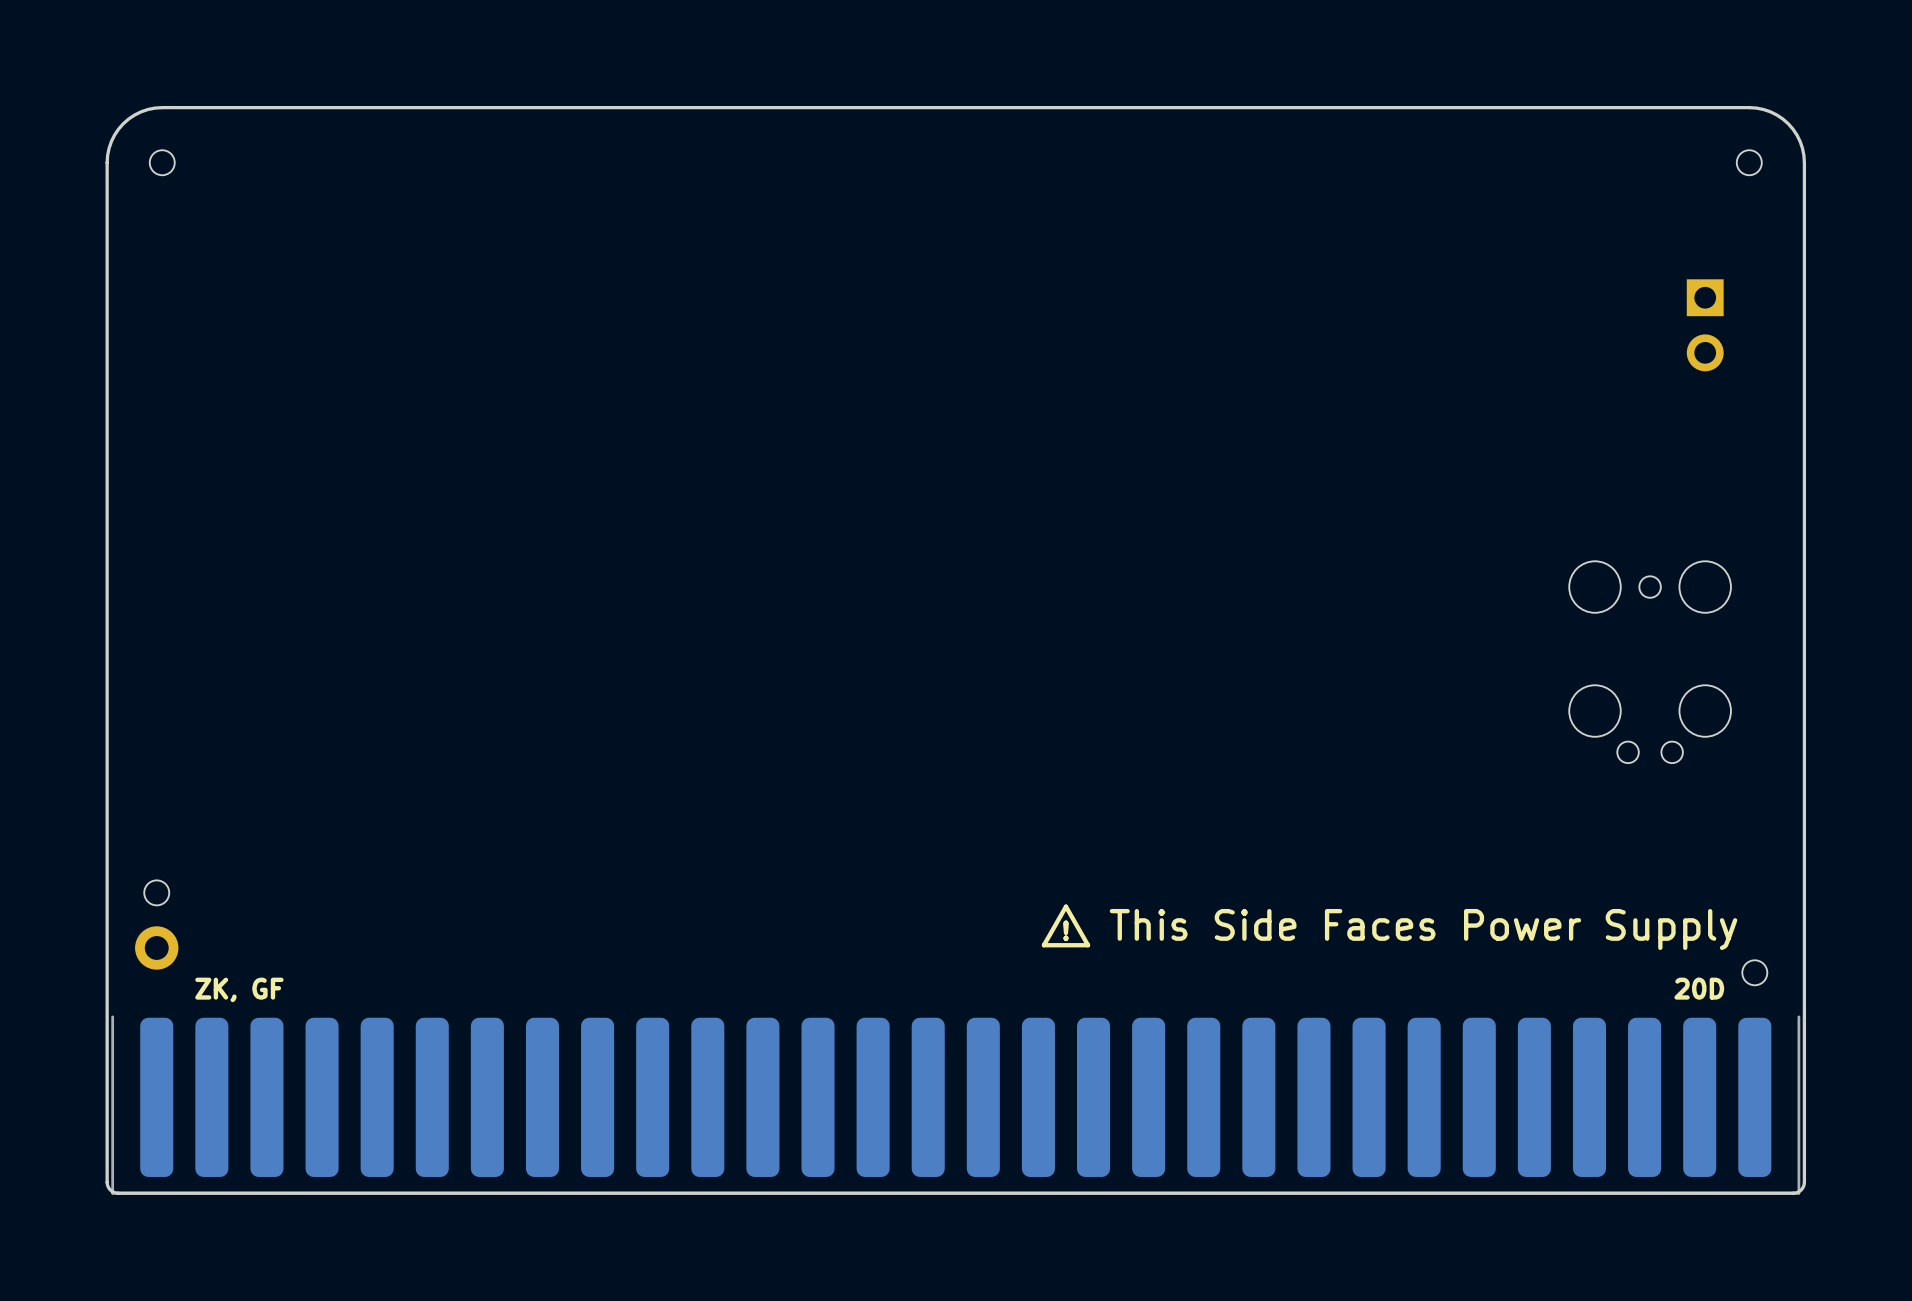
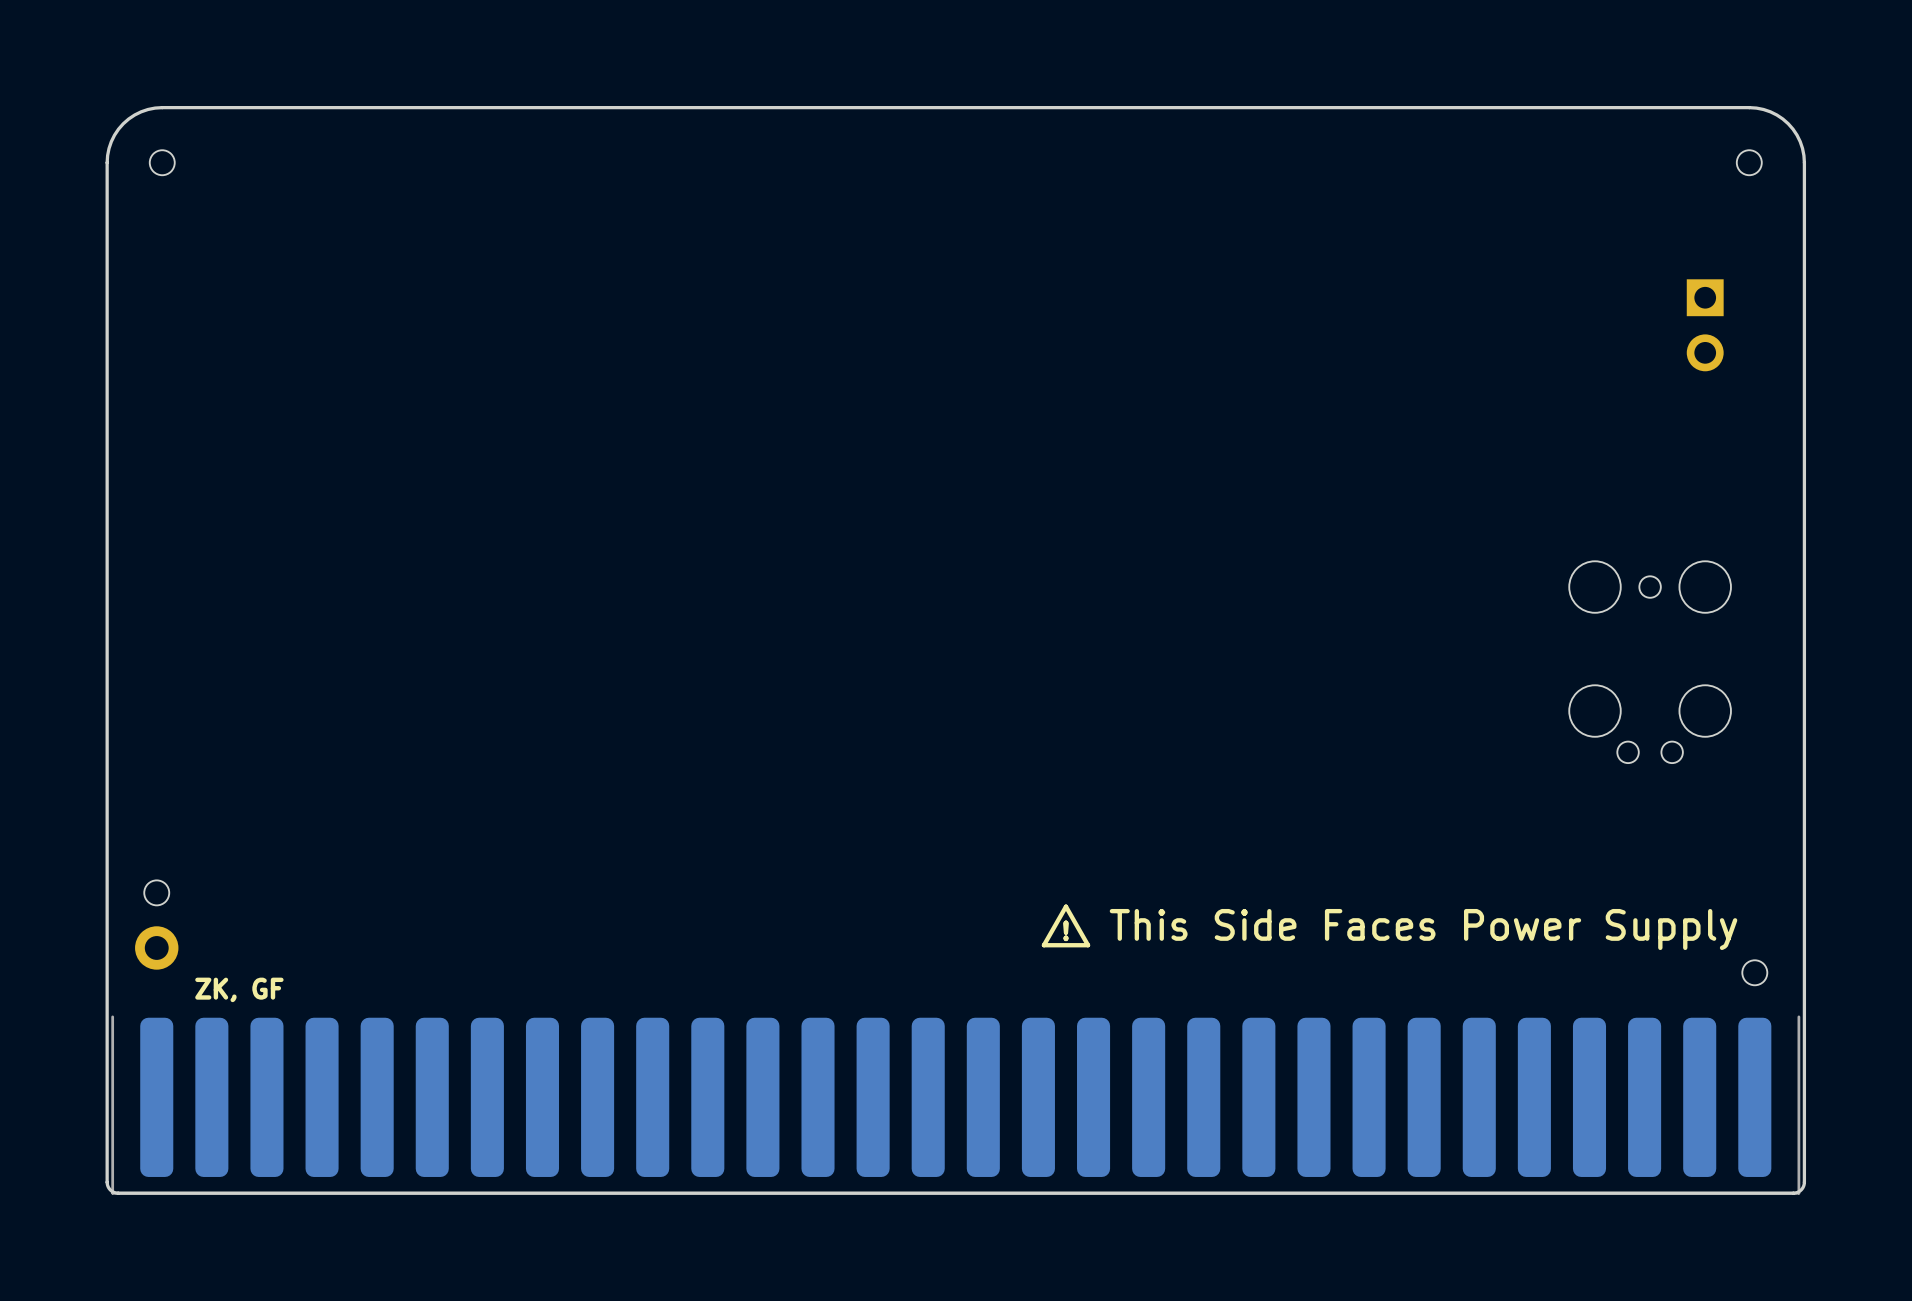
text: 20D (1699, 988) -> none

